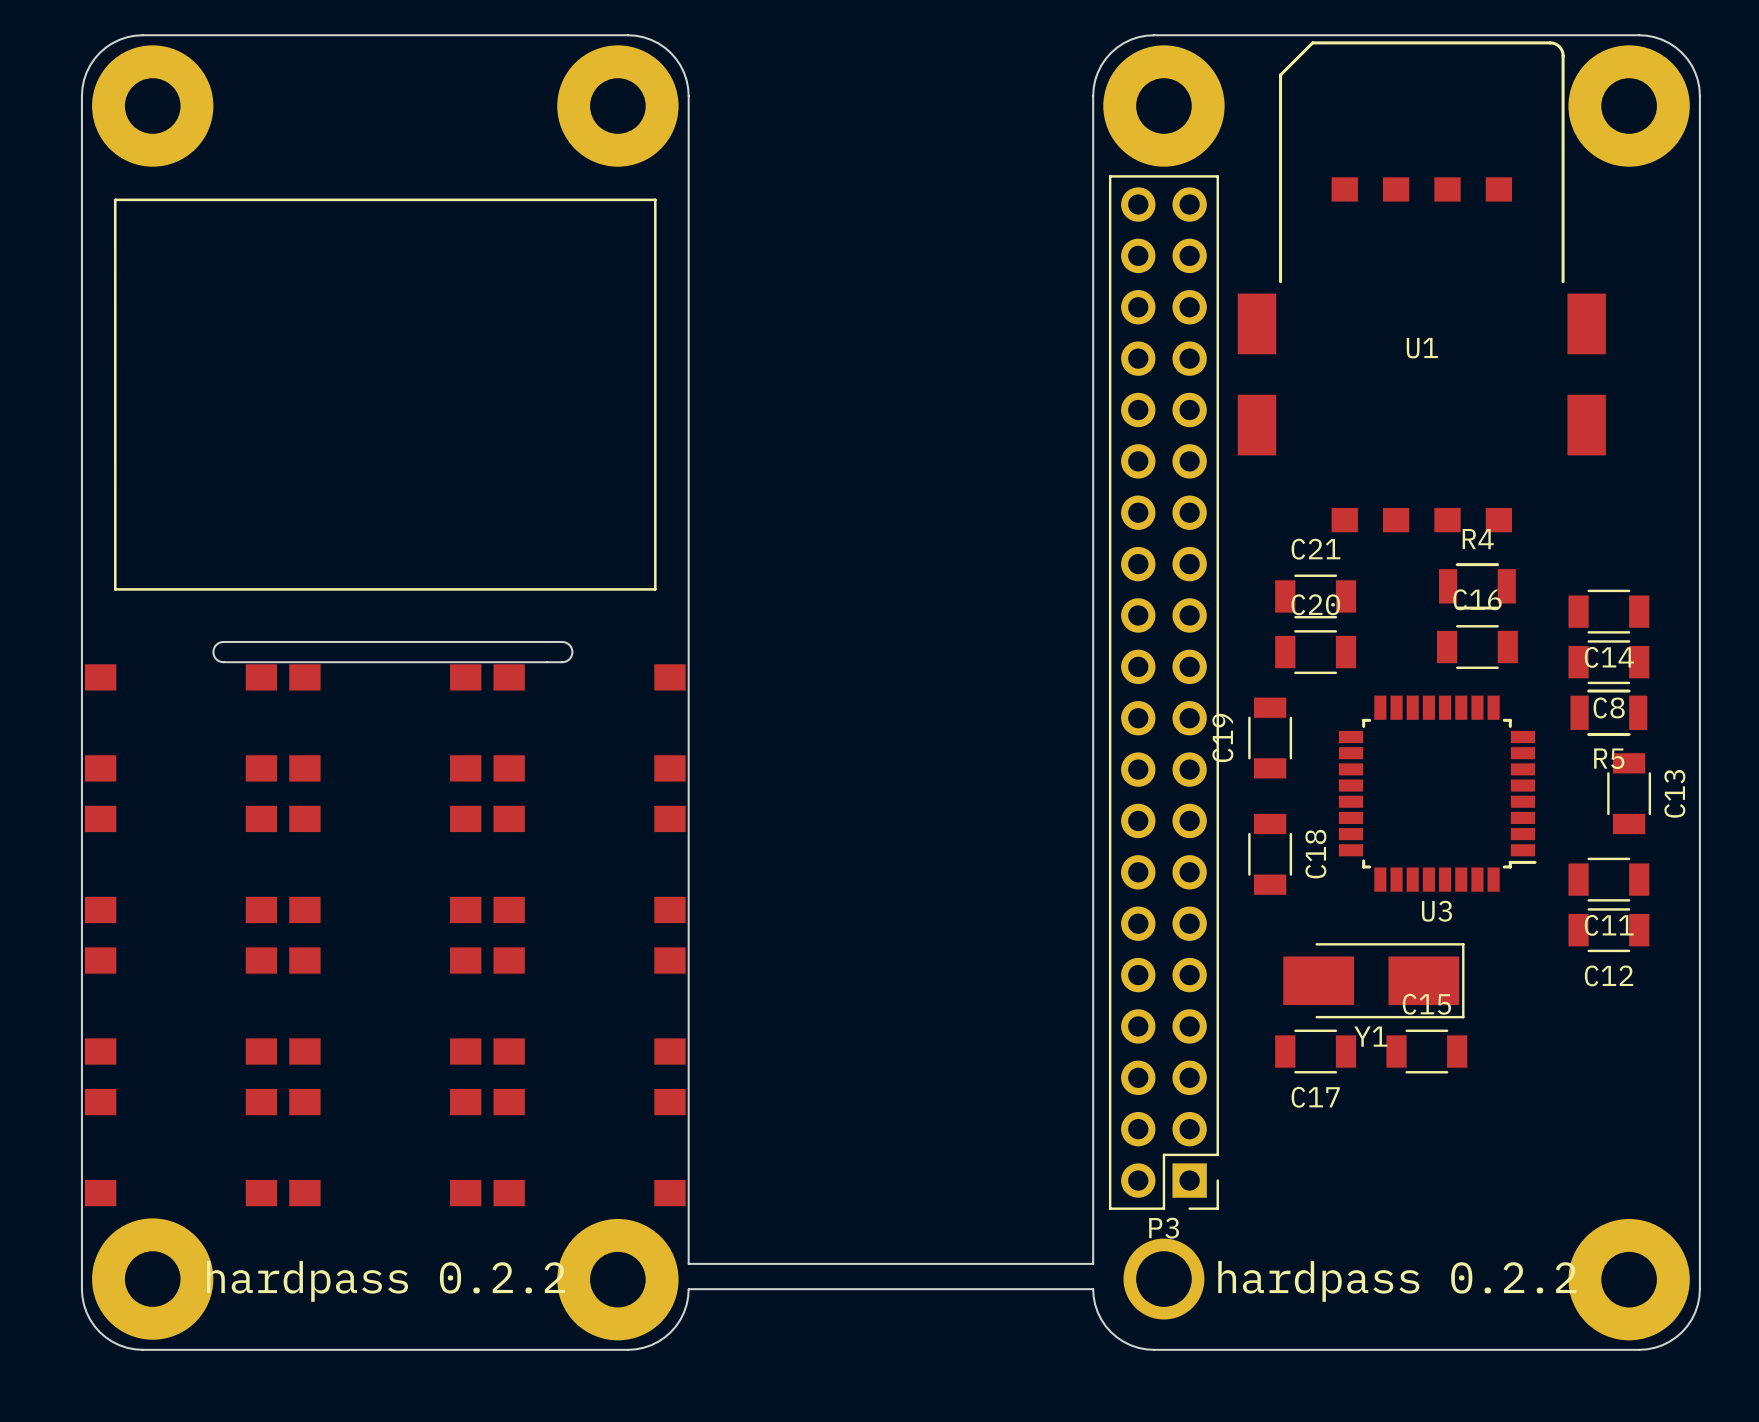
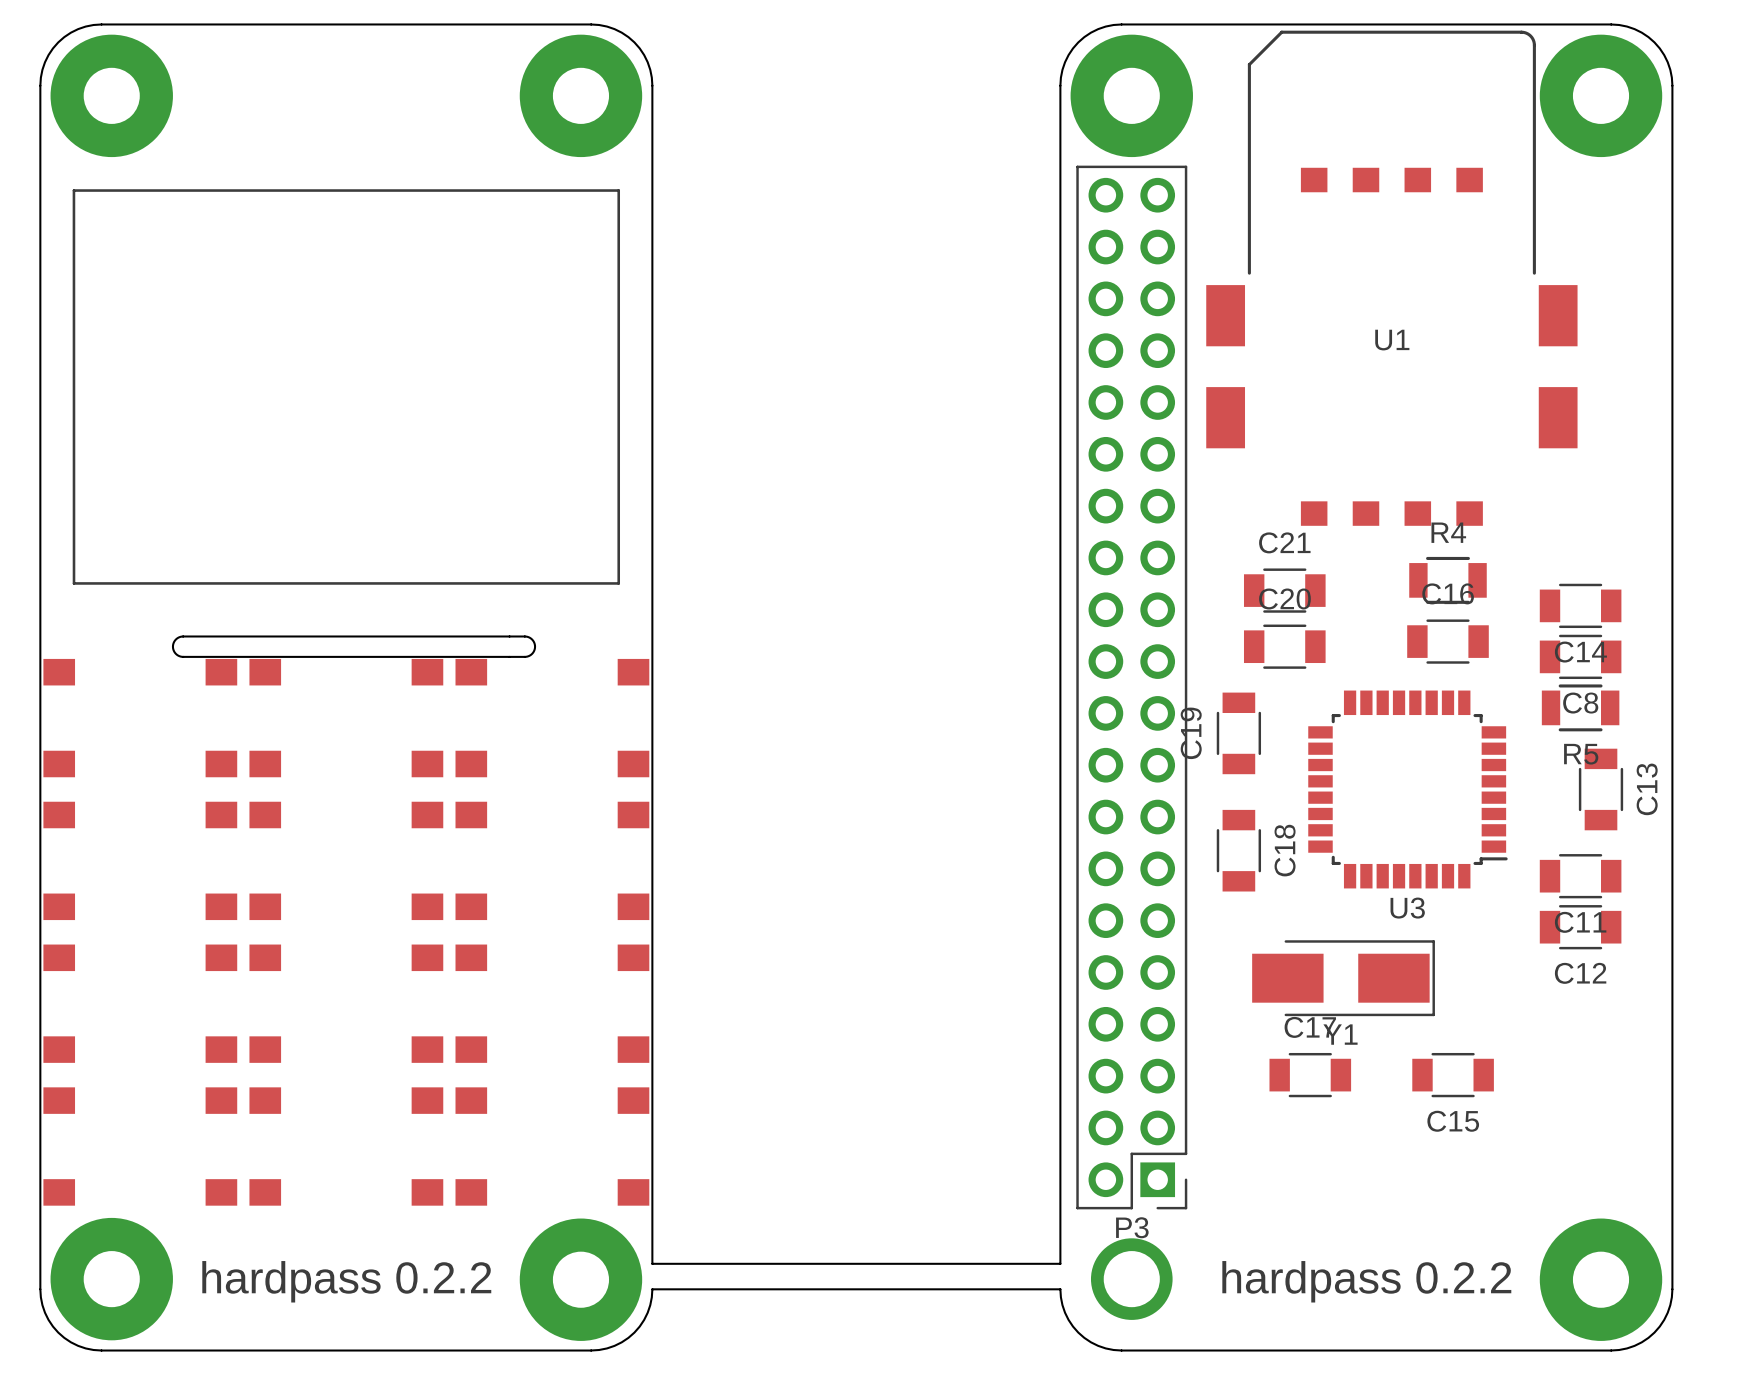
C15 name position: C15 (1426, 1004) -> C15 (1453, 1121)
C17 position: (1315, 1051) -> (1310, 1075)
C15 position: (1426, 1051) -> (1453, 1075)
C17 name position: C17 (1315, 1097) -> C17 (1310, 1027)

